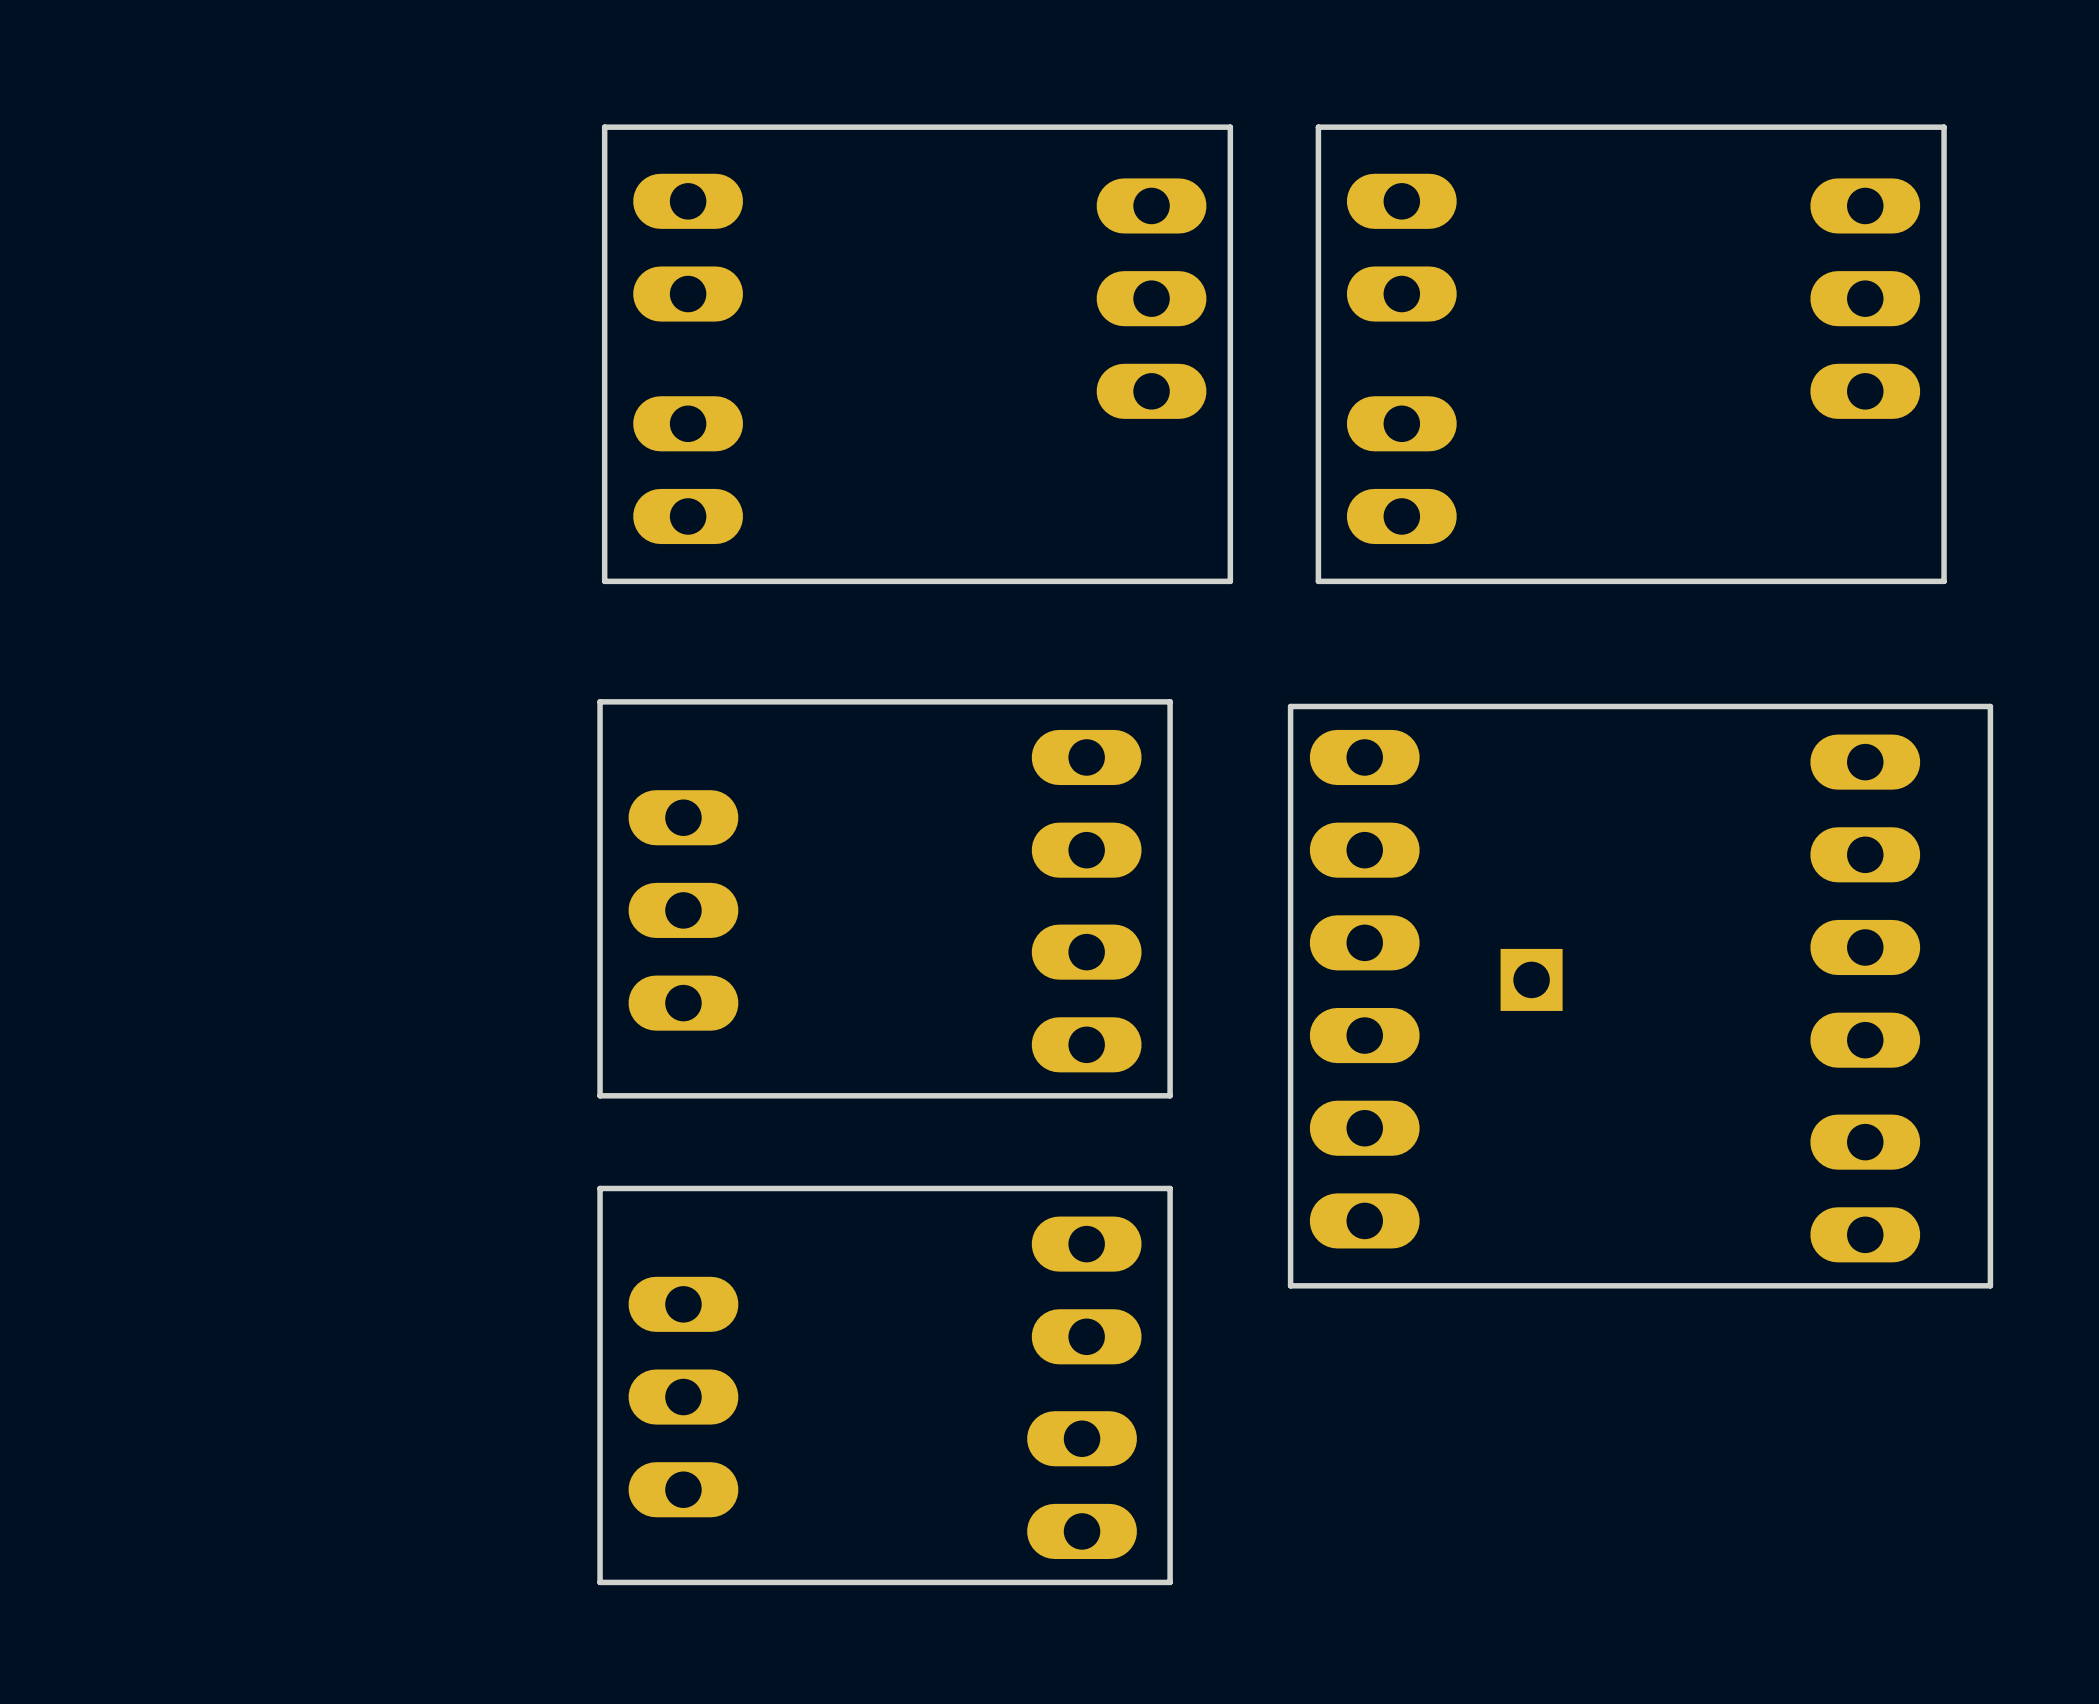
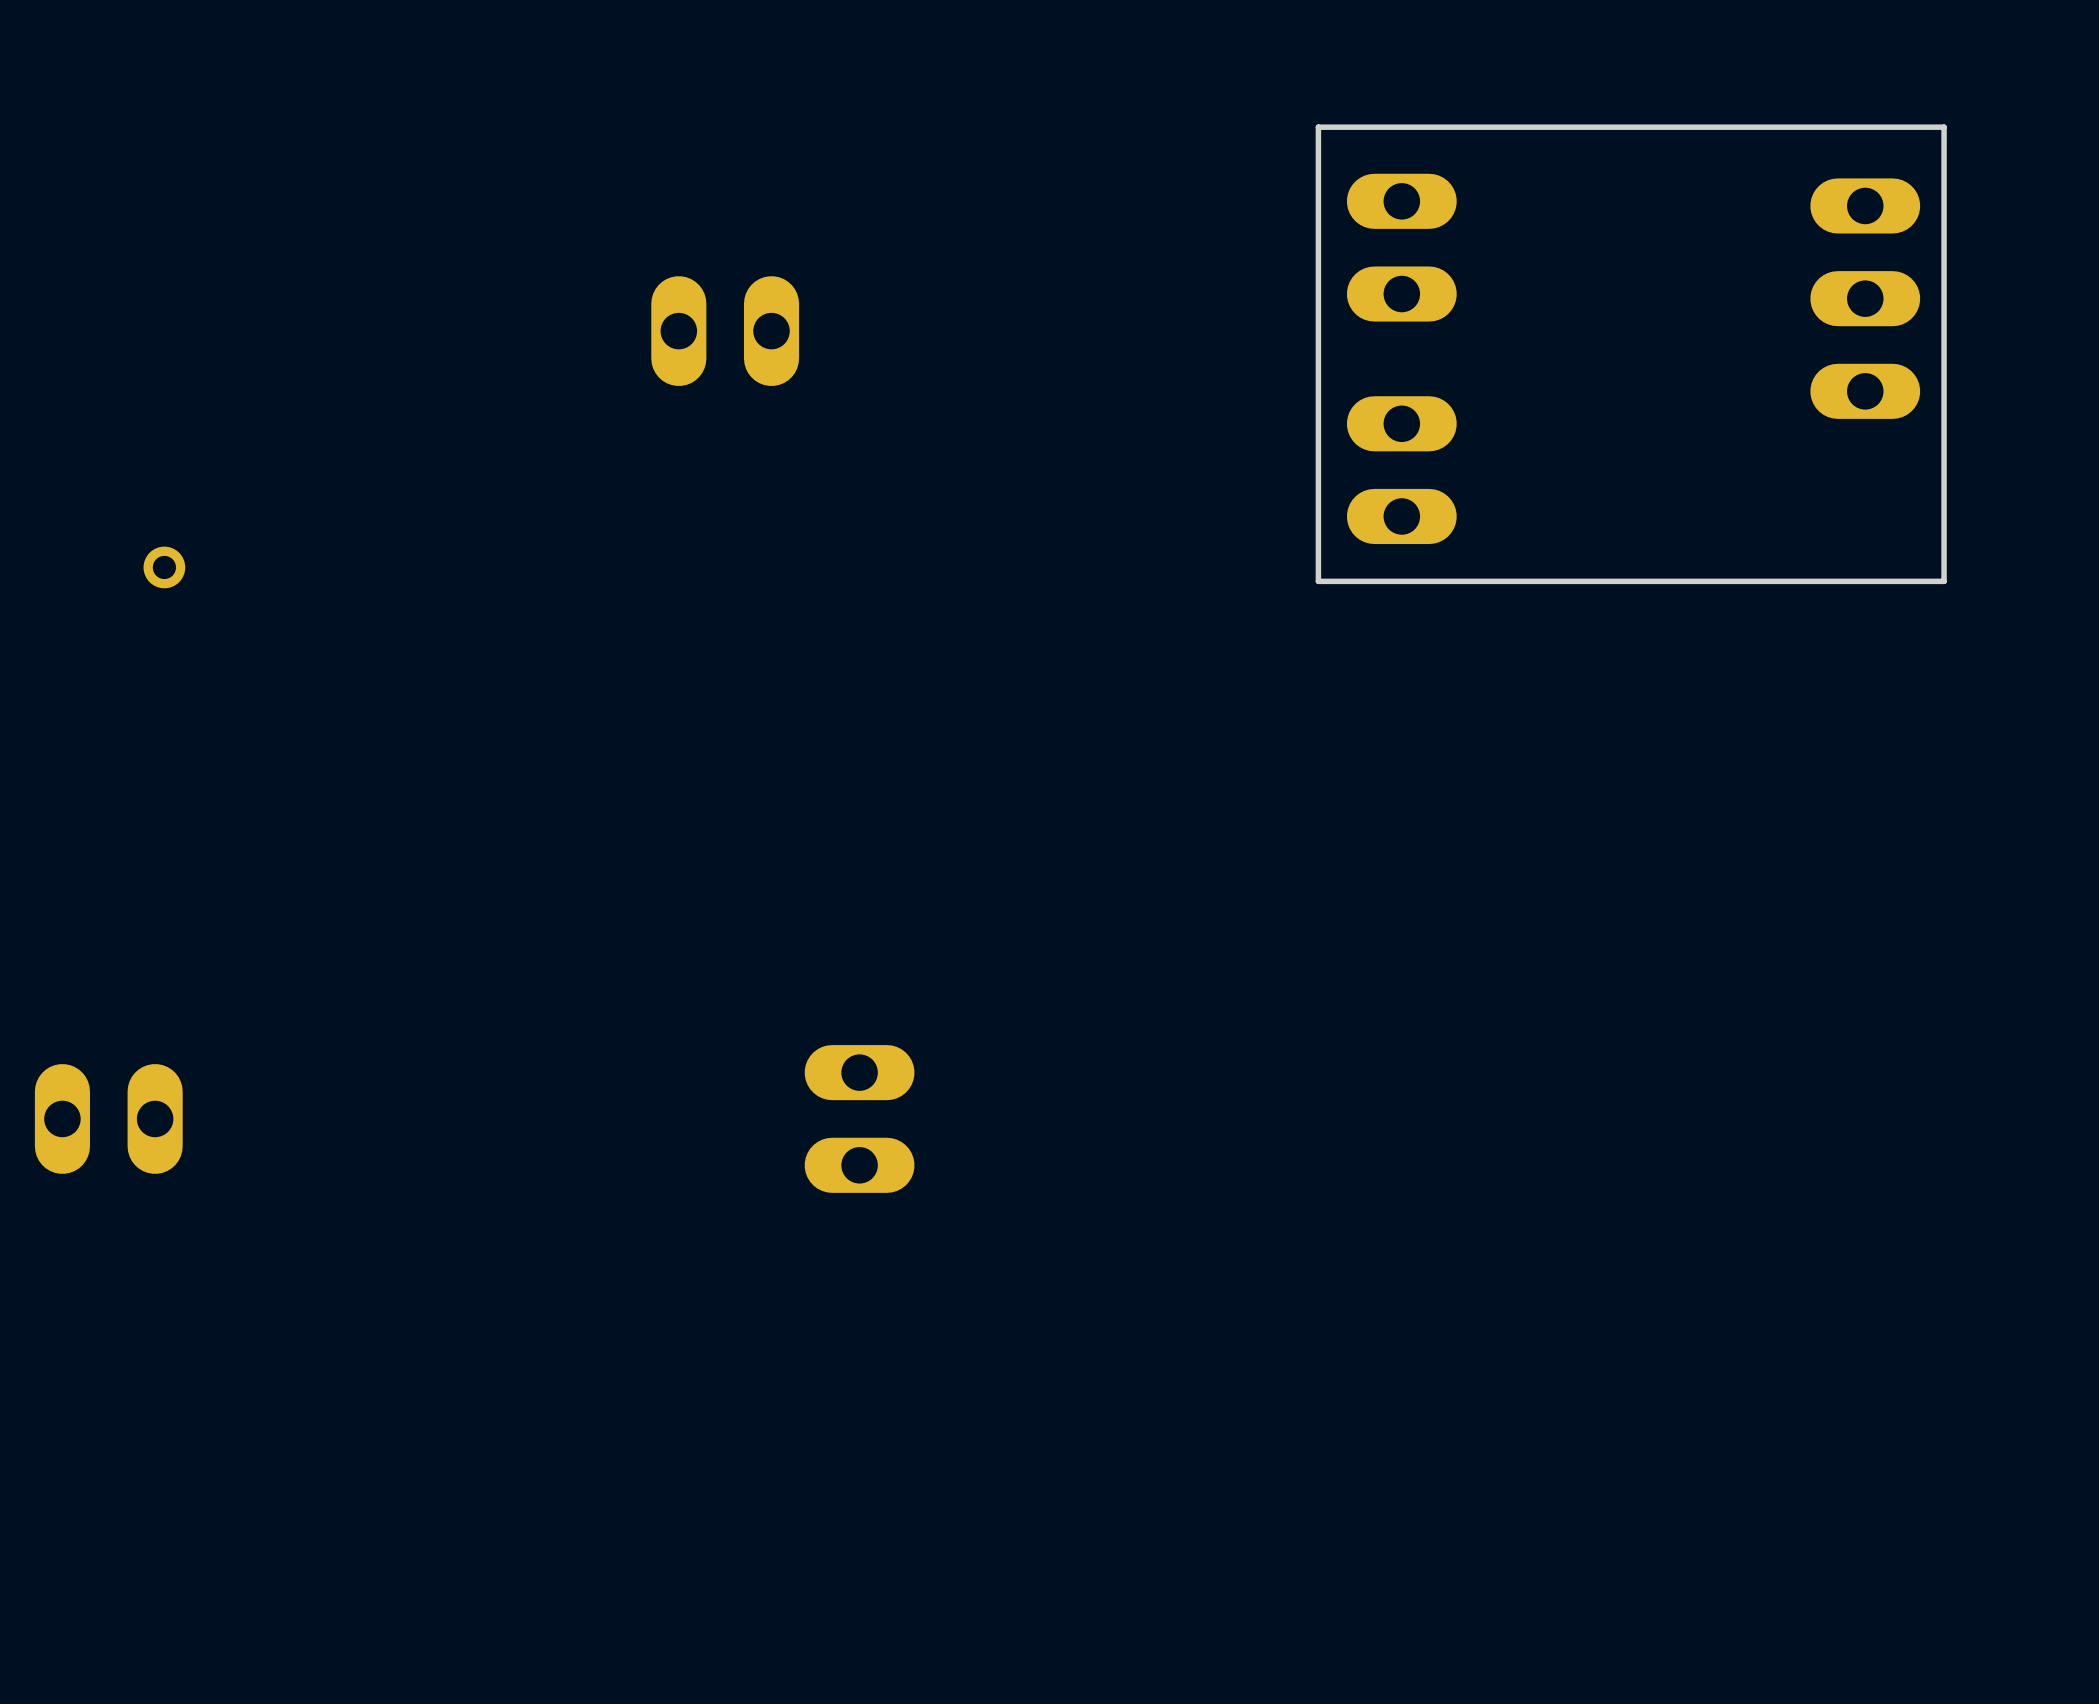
board edge: (1230, 127) (604, 127) (604, 581) (1230, 581) (1230, 127) -> none
part: (688, 247) -> none
part: (1151, 298) -> none
part: none -> (725, 331)
part: (688, 470) -> none
part: none -> (164, 567)
board edge: (1170, 701) (1170, 1095) (600, 1095) (600, 701) (1170, 701) -> none
board edge: (1990, 706) (1290, 706) (1290, 1285) (1990, 1285) (1990, 706) -> none
part: (1086, 803) -> none
part: (1865, 808) -> none
part: (1364, 850) -> none
part: (683, 910) -> none
part: (1531, 979) -> none
part: (1865, 993) -> none
part: (1086, 998) -> none
part: none -> (108, 1118)
part: none -> (859, 1118)
part: (1364, 1128) -> none
board edge: (1170, 1188) (1170, 1582) (600, 1582) (600, 1188) (1170, 1188) -> none
part: (1865, 1188) -> none
part: (1086, 1290) -> none
part: (683, 1397) -> none
part: (1082, 1485) -> none

